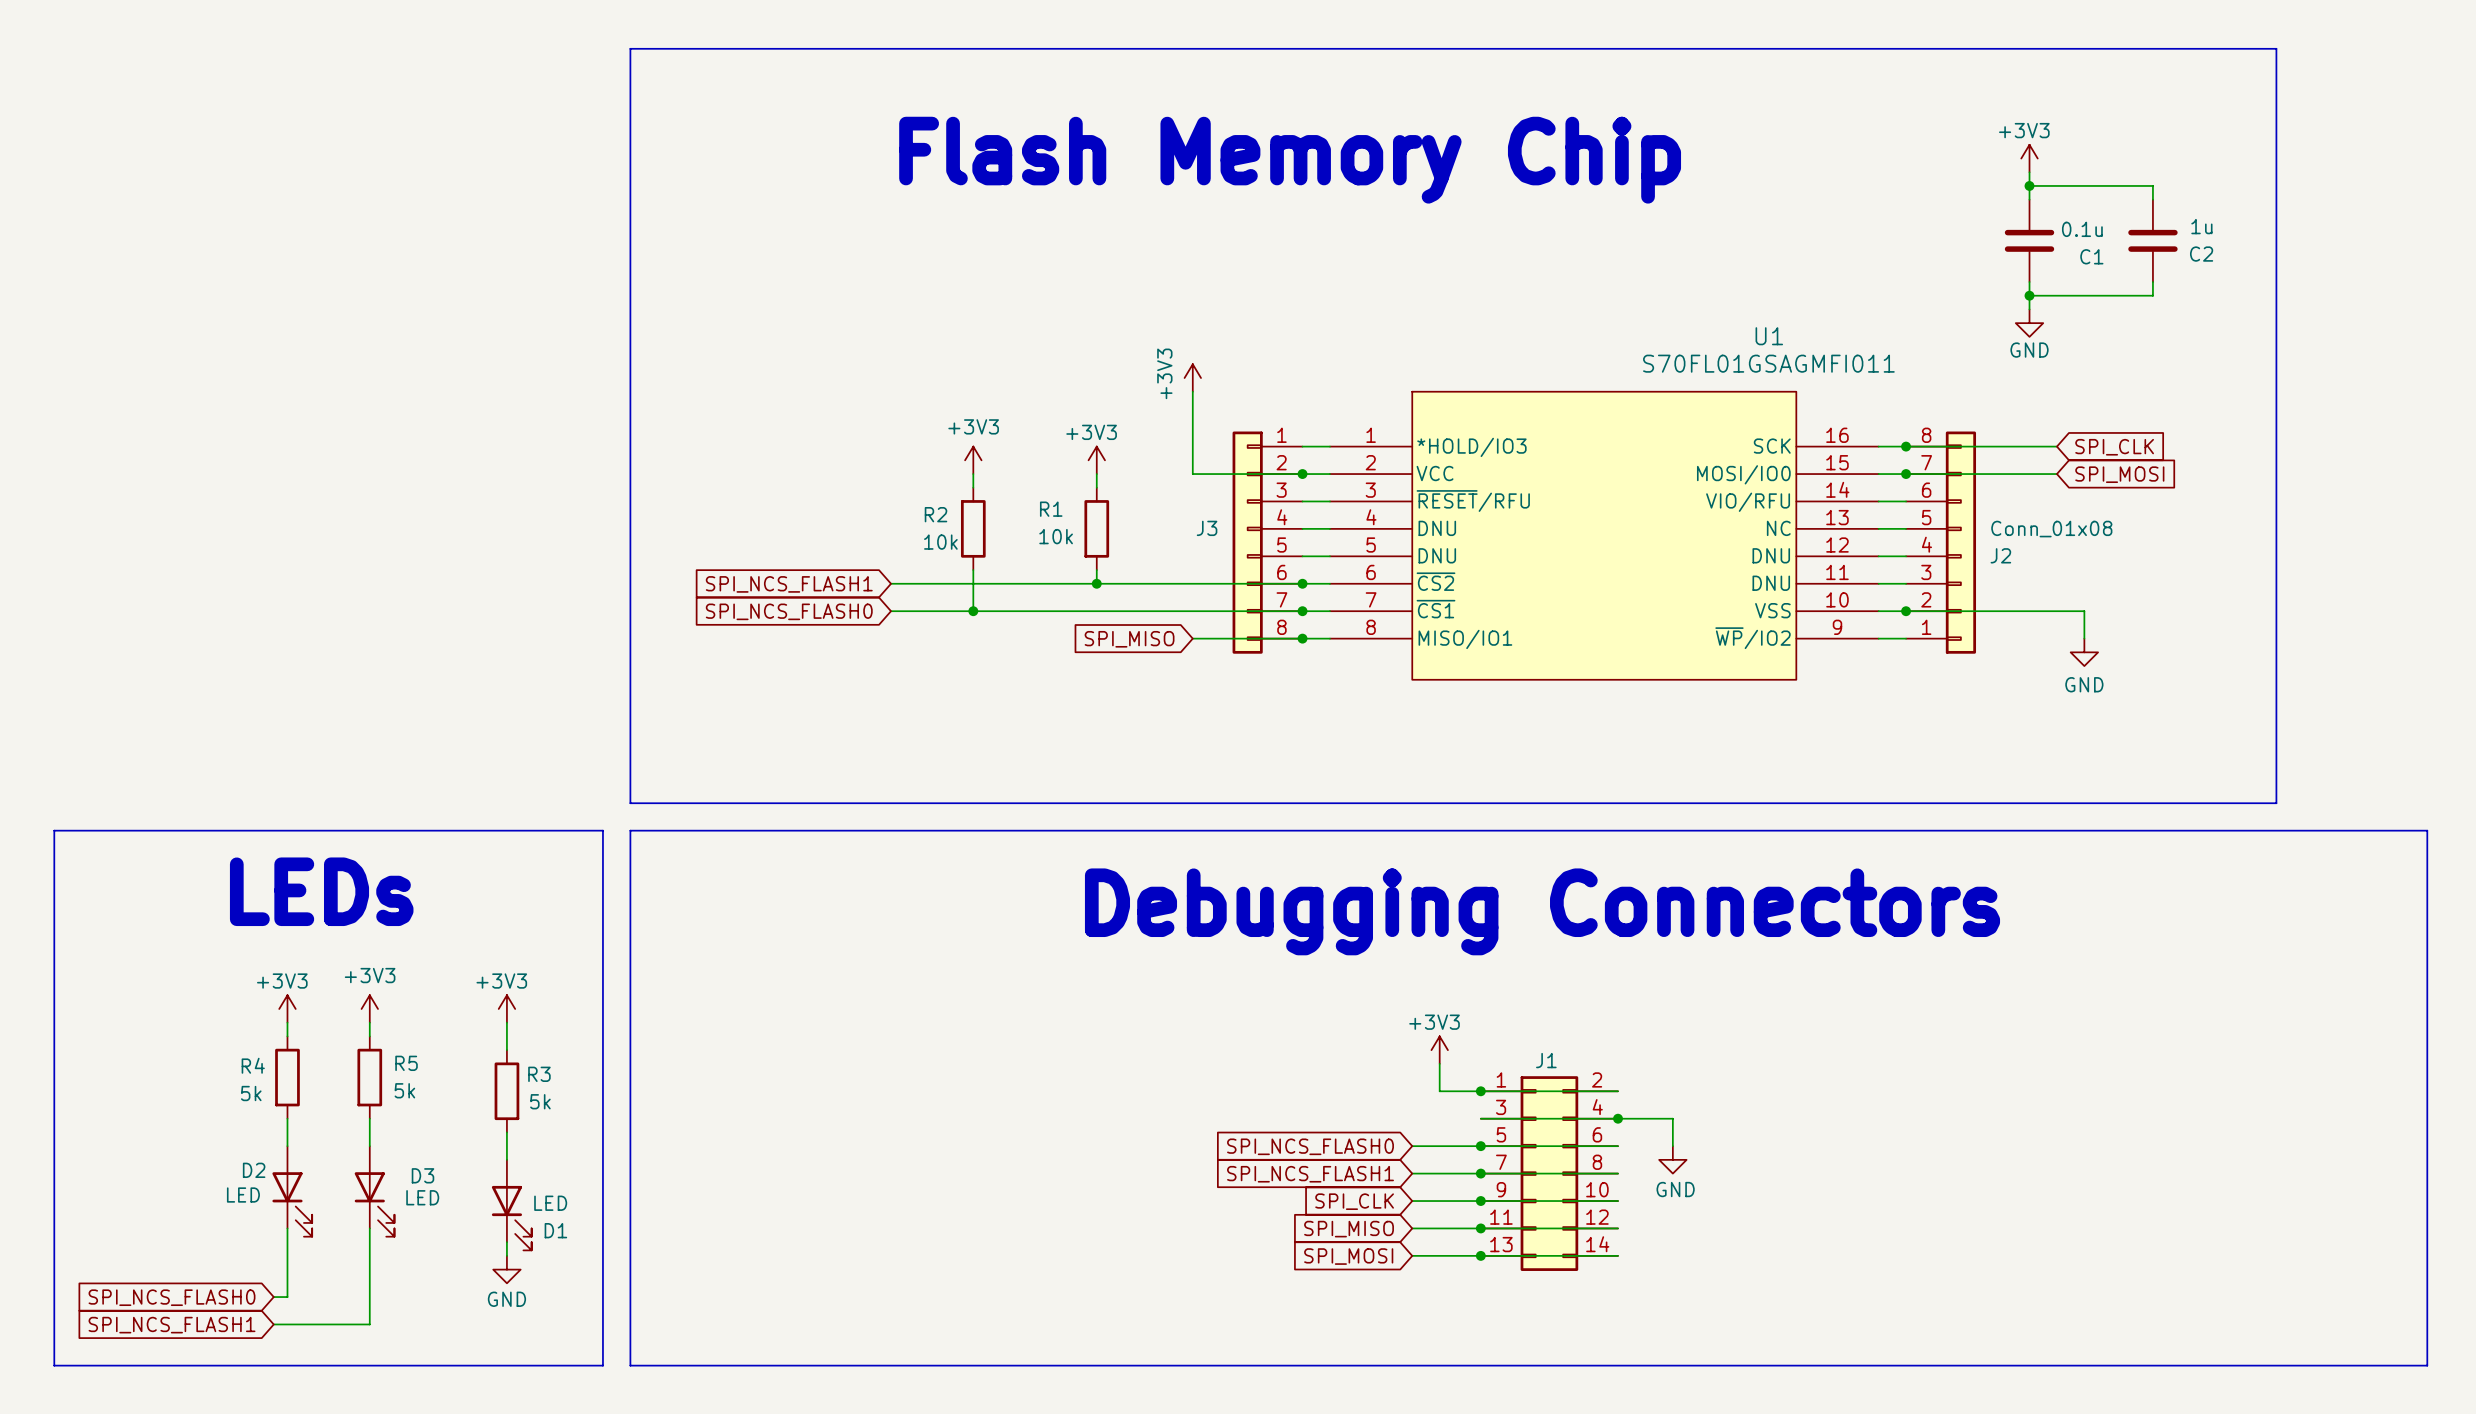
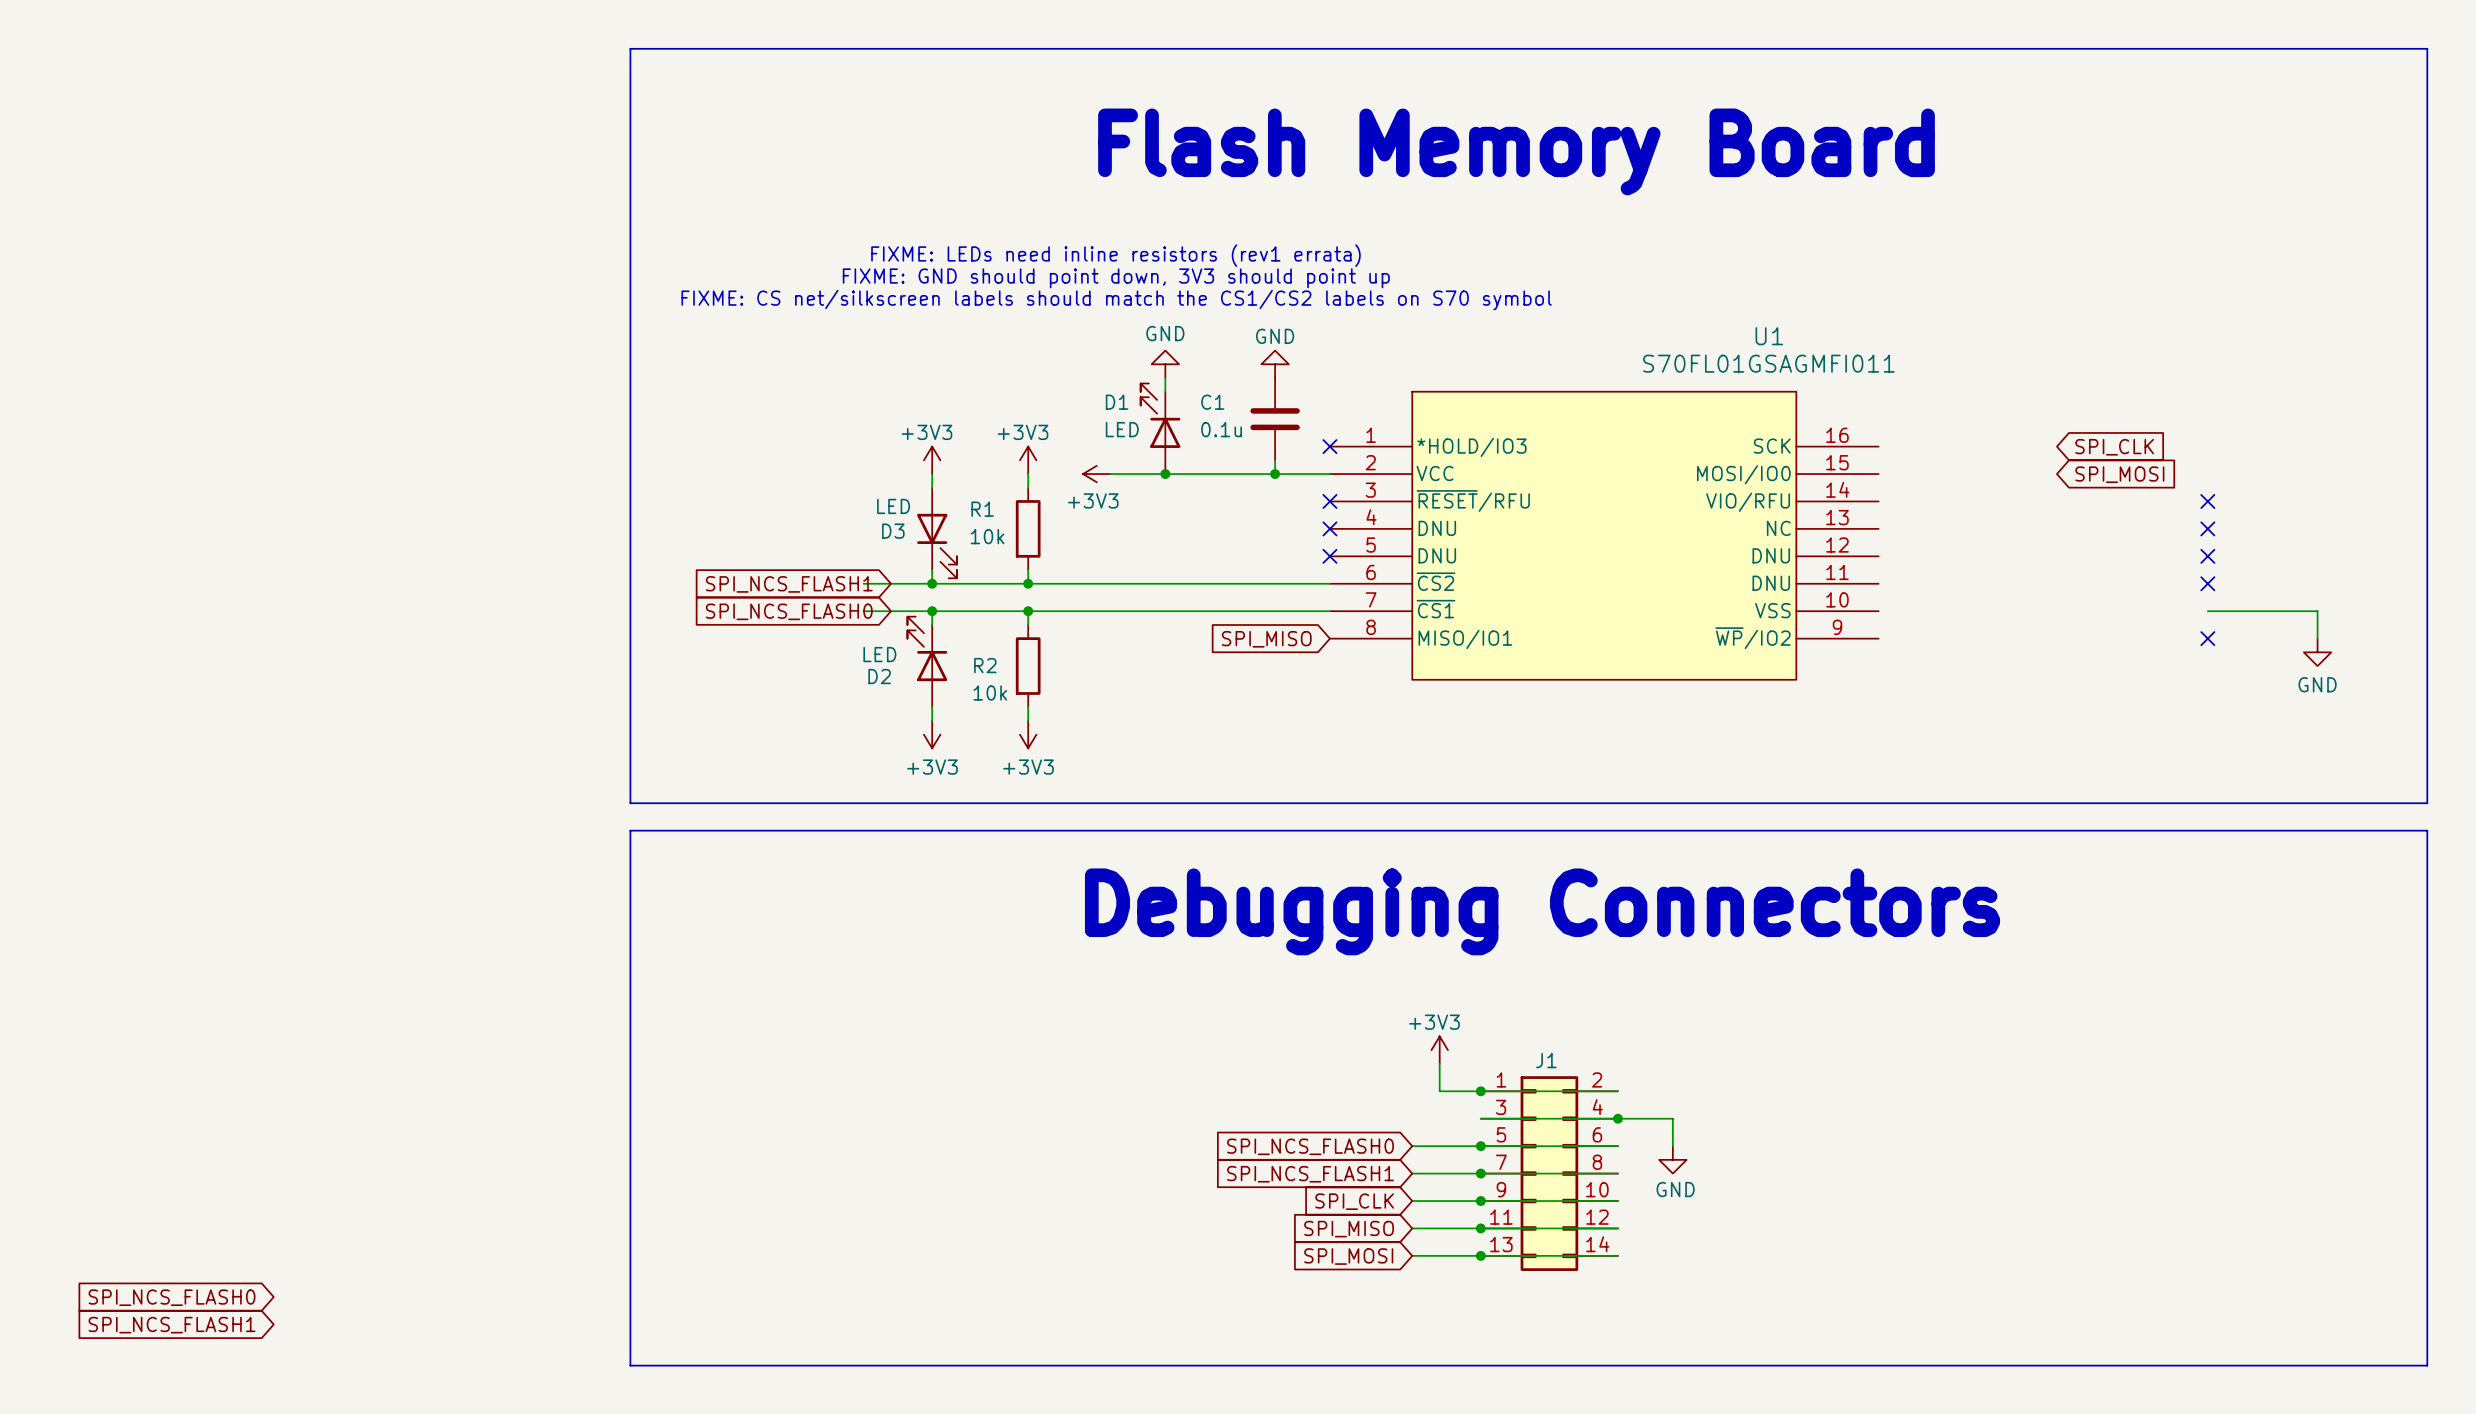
line: (2276, 48) (2276, 803) -> (2276, 48) (2427, 48) (2427, 803) (2276, 803)
power symbol: +3V3 (2029, 158) -> none
text: Flash Memory Chip (1290, 160) -> Flash Memory Board (1516, 151)
wire: (2029, 172) (2029, 199) -> none
wire: (2029, 185) (2152, 185) (2152, 199) -> none
junction: (2029, 185) -> none
C1 value position: 0.1u (2082, 229) -> 0.1u (1221, 429)
C1 position: (2029, 240) -> (1275, 419)
C2: 1u (2152, 240) -> none
text: none -> FIXME: LEDs need inline resistors (rev1 errata) (1115, 255)
C1 name position: C1 (2091, 256) -> C1 (1212, 402)
text: none -> FIXME: GND should point down, 3V3 should point up (1116, 278)
wire: (2029, 281) (2029, 309) -> none
wire: (2152, 281) (2152, 295) (2029, 295) -> none
junction: (2029, 295) -> none
text: none -> FIXME: CS net/silkscreen labels should match the CS1/CS2 labels on S70 symbol (1116, 300)
power symbol: GND (2029, 323) -> none
power symbol: none -> GND (1165, 364)
power symbol: none -> GND (1275, 364)
wire: none -> (1165, 378) (1165, 391)
power symbol: +3V3 (1192, 378) -> none
wire: (1192, 391) (1192, 474) -> (1110, 474) (1192, 474)
power symbol text position: +3V3 (1091, 432) -> +3V3 (1093, 500)
wire: (1302, 446) (1329, 446) -> none
no-connect mark: none -> (1329, 446)
wire: (1878, 446) (2056, 446) -> none
junction: (1906, 446) -> none
power symbol: none -> +3V3 (932, 460)
power symbol: +3V3 (973, 460) -> none
power symbol: none -> +3V3 (1028, 460)
power symbol rotation: 0° (1096, 460) -> 90° counterclockwise (1096, 474)
wire: none -> (1275, 460) (1275, 474)
wire: (973, 474) (973, 487) -> (932, 474) (932, 487)
wire: (1096, 474) (1096, 487) -> (1028, 474) (1028, 487)
junction: none -> (1165, 474)
junction position: (1302, 474) -> (1275, 474)
wire: (1878, 474) (2056, 474) -> none
junction: (1906, 474) -> none
wire: (1302, 501) (1329, 501) -> none
no-connect mark: none -> (1329, 501)
wire: (1878, 501) (1906, 501) -> none
no-connect mark: none -> (2207, 501)
R2 name position: R2 (935, 514) -> R2 (985, 665)
R2 position: (973, 528) -> (1028, 666)
R1 position: (1096, 528) -> (1028, 528)
wire: (1302, 528) (1329, 528) -> none
no-connect mark: none -> (1329, 528)
wire: (1878, 528) (1906, 528) -> none
no-connect mark: none -> (2207, 528)
R2 value position: 10k (940, 542) -> 10k (990, 692)
J3: (1267, 542) -> none
J2: Conn_01x08 (1941, 542) -> none
wire: (1302, 556) (1329, 556) -> none
no-connect mark: none -> (1329, 556)
wire: (1878, 556) (1906, 556) -> none
no-connect mark: none -> (2207, 556)
wire: none -> (932, 570) (932, 583)
wire: (973, 570) (973, 611) -> none
wire: (1096, 570) (1096, 583) -> (1028, 570) (1028, 583)
wire: none -> (863, 583) (891, 583)
junction: none -> (932, 583)
junction: none -> (1028, 583)
junction: (1096, 583) -> none
junction: (1302, 583) -> none
wire: (1878, 583) (1906, 583) -> none
no-connect mark: none -> (2207, 583)
wire: none -> (863, 611) (891, 611)
wire: none -> (932, 611) (932, 624)
junction: none -> (932, 611)
junction: (973, 611) -> none
wire: none -> (1028, 611) (1028, 624)
junction: none -> (1028, 611)
junction: (1302, 611) -> none
wire: (1878, 611) (2084, 611) (2084, 638) -> none
junction: (1906, 611) -> none
wire: none -> (2207, 611) (2317, 611) (2317, 638)
wire: (1192, 638) (1329, 638) -> none
junction: (1302, 638) -> none
wire: (1878, 638) (1906, 638) -> none
no-connect mark: none -> (2207, 638)
global label position: SPI_MISO (1129, 639) -> SPI_MISO (1266, 639)
power symbol: GND (2084, 652) -> none
power symbol: none -> GND (2317, 652)
wire: none -> (932, 707) (932, 720)
wire: none -> (1028, 707) (1028, 720)
power symbol: none -> +3V3 (932, 734)
power symbol: none -> +3V3 (1028, 734)
line: (54, 830) (602, 830) (602, 1365) (54, 1365) (54, 830) -> none
text: LEDs (321, 891) -> none
power symbol: +3V3 (287, 1008) -> none
power symbol: +3V3 (369, 1008) -> none
power symbol: +3V3 (506, 1008) -> none
wire: (287, 1022) (287, 1036) -> none
wire: (369, 1022) (369, 1036) -> none
wire: (506, 1022) (506, 1050) -> none
R4: 5k (287, 1077) -> none
R5: 5k (369, 1077) -> none
R3: 5k (506, 1091) -> none
wire: (287, 1118) (287, 1146) -> none
wire: (369, 1118) (369, 1146) -> none
wire: (506, 1132) (506, 1159) -> none
D2 name position: D2 (254, 1170) -> D2 (879, 676)
D3 name position: D3 (422, 1175) -> D3 (893, 531)
D2 position: (292, 1191) -> (927, 661)
D3 position: (374, 1191) -> (936, 533)
D3 value position: LED (422, 1197) -> LED (893, 506)
D2 rotation: 0° (292, 1204) -> 180° (927, 648)
D1 position: (511, 1205) -> (1160, 428)
D1 rotation: 0° (511, 1218) -> 180° (1160, 415)
wire: (287, 1228) (287, 1297) (273, 1297) -> none
wire: (369, 1228) (369, 1324) (273, 1324) -> none
wire: (506, 1242) (506, 1255) -> none
power symbol: GND (506, 1269) -> none

